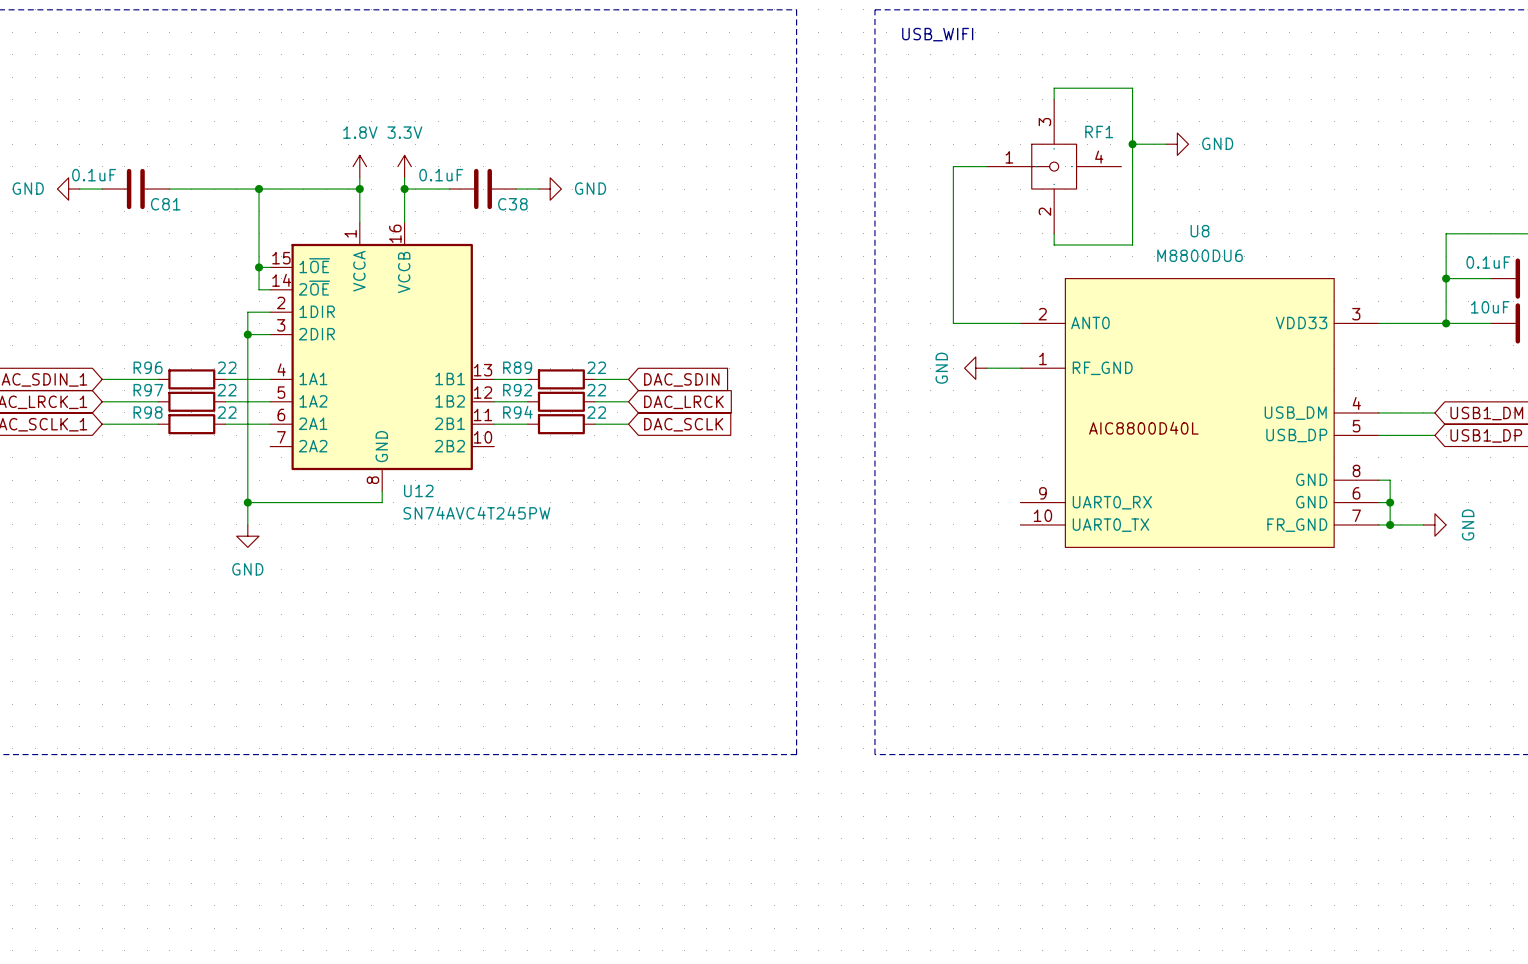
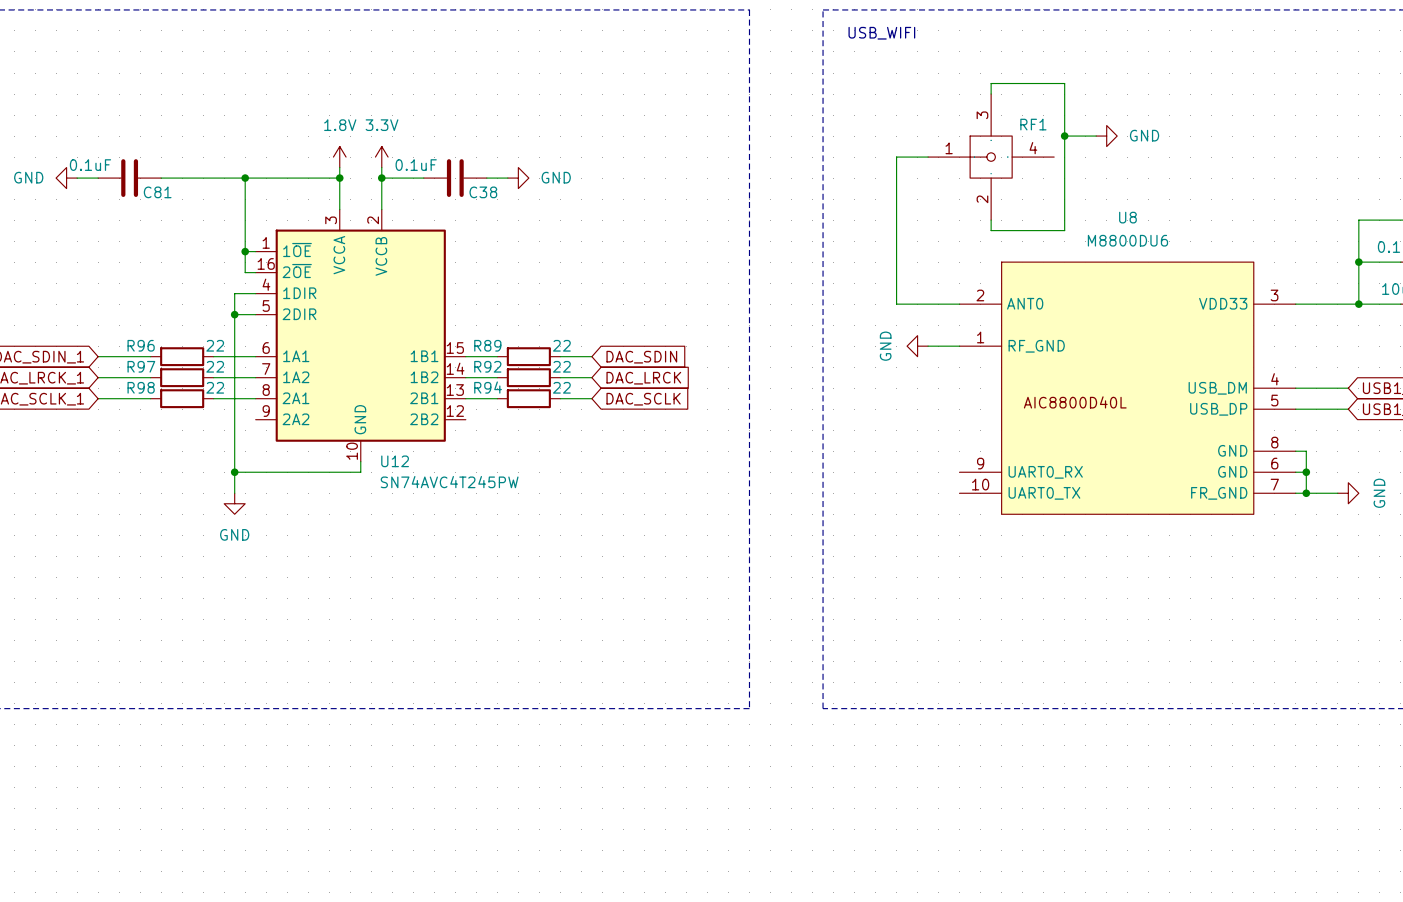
U12 symbol: [270, 222, 495, 492] -> [255, 209, 466, 462]

